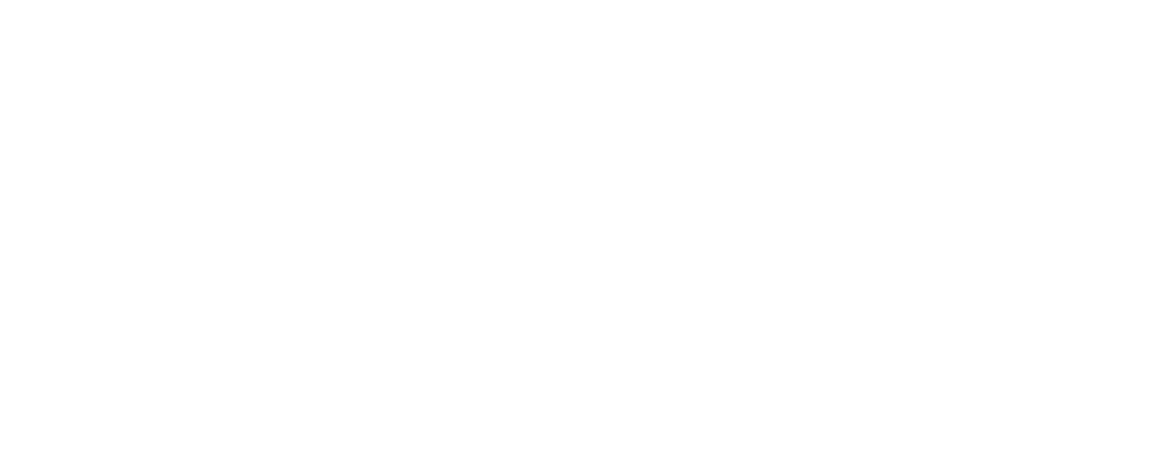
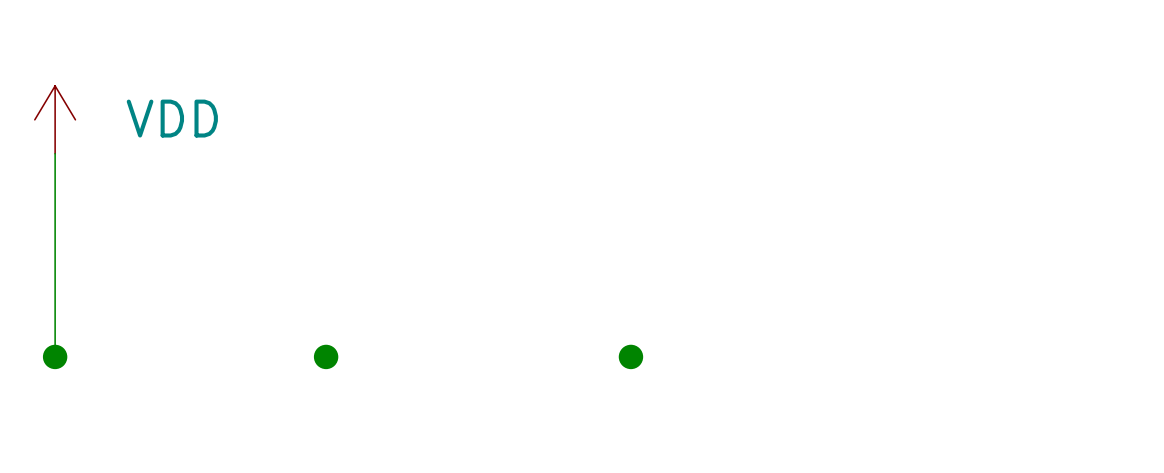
power symbol: none -> VDD (55, 119)
wire: none -> (55, 153) (55, 356)
junction: none -> (55, 356)
junction: none -> (326, 356)
junction: none -> (630, 356)

